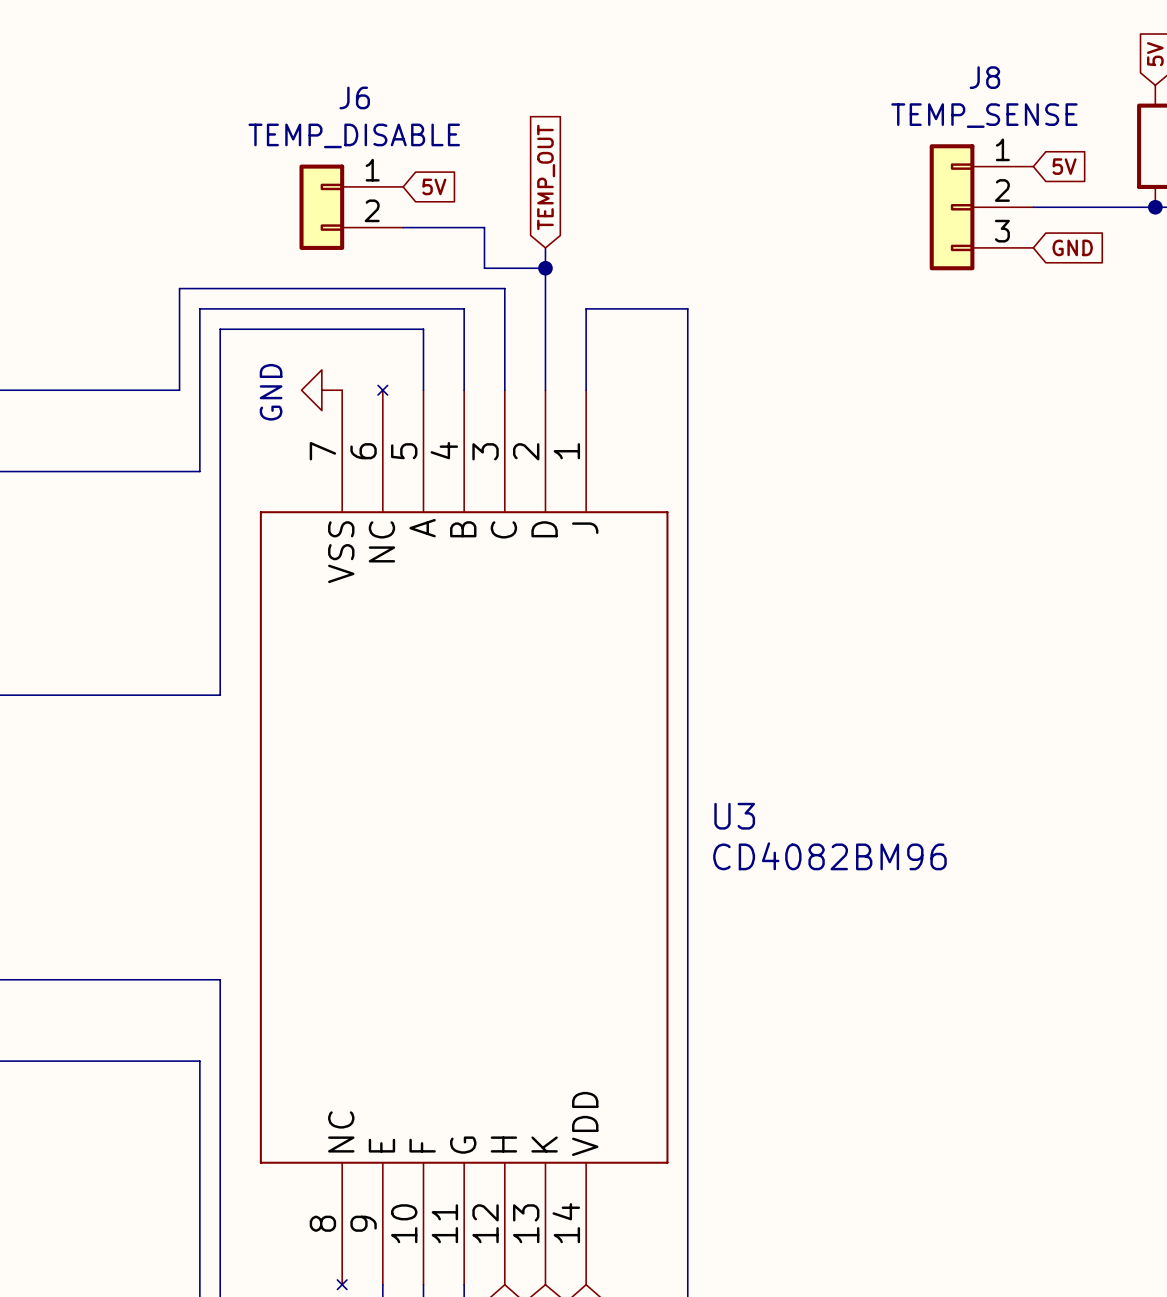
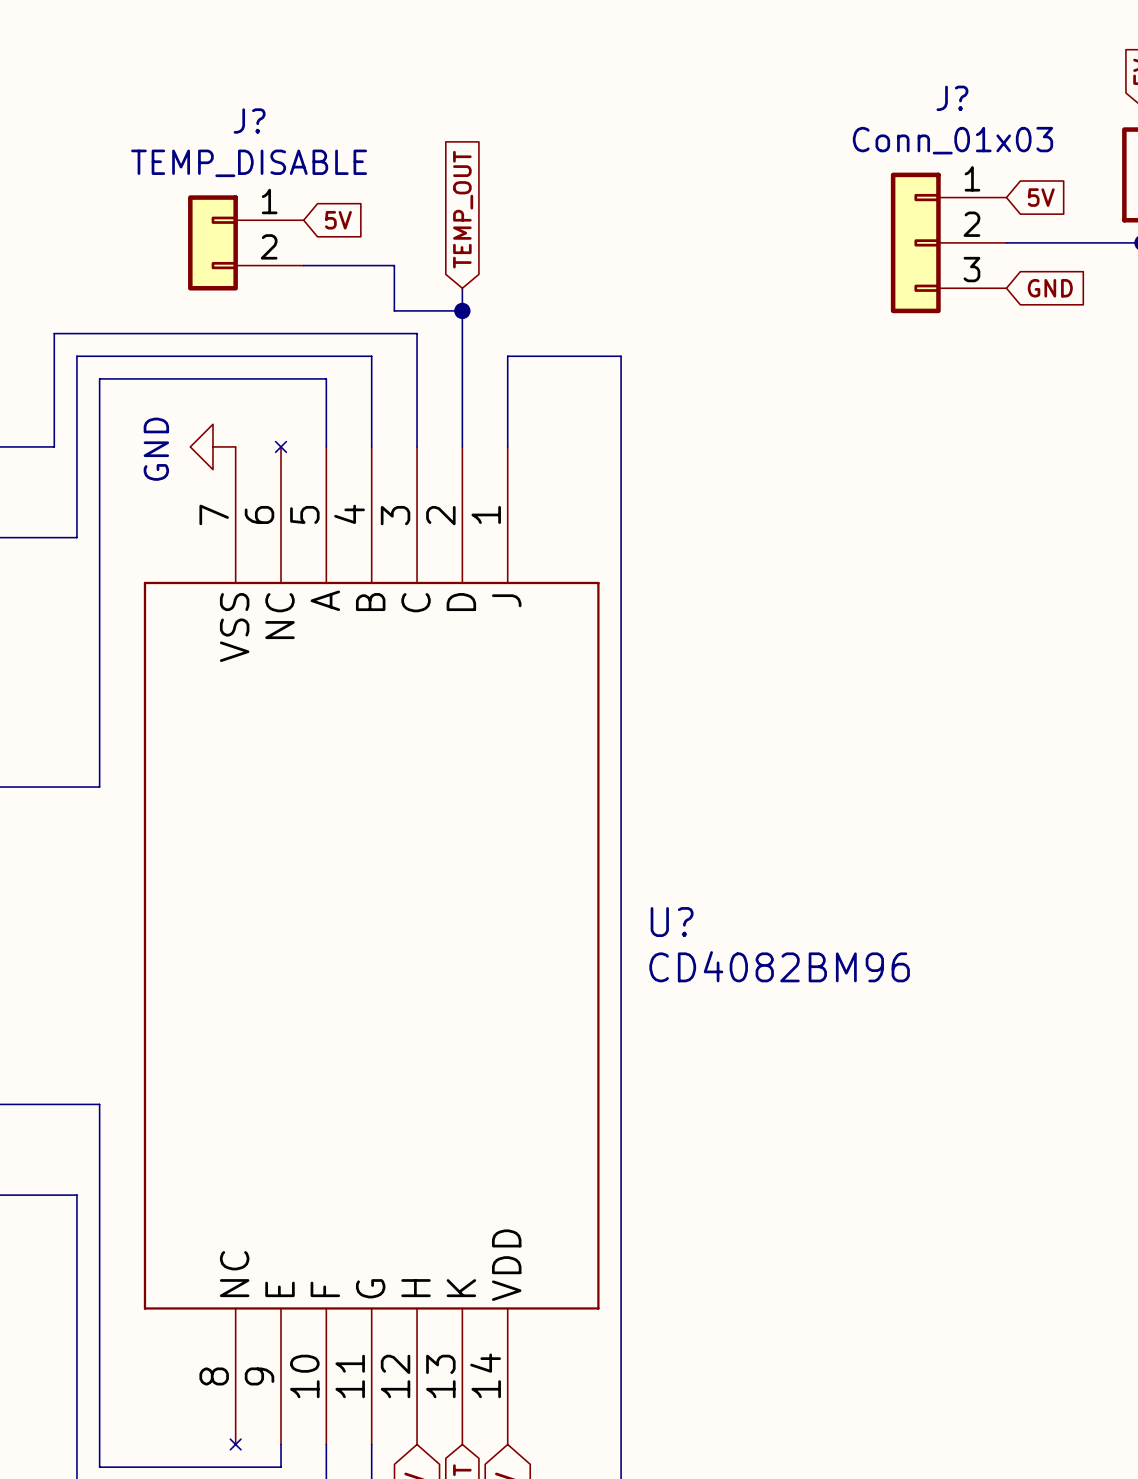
J8 name: J8 (984, 77) -> J? (952, 98)
J6 name: J6 (354, 97) -> J? (249, 121)
J8 value: TEMP_SENSE (984, 115) -> Conn_01x03 (952, 140)
U3 name: U3 (734, 816) -> U? (672, 922)

